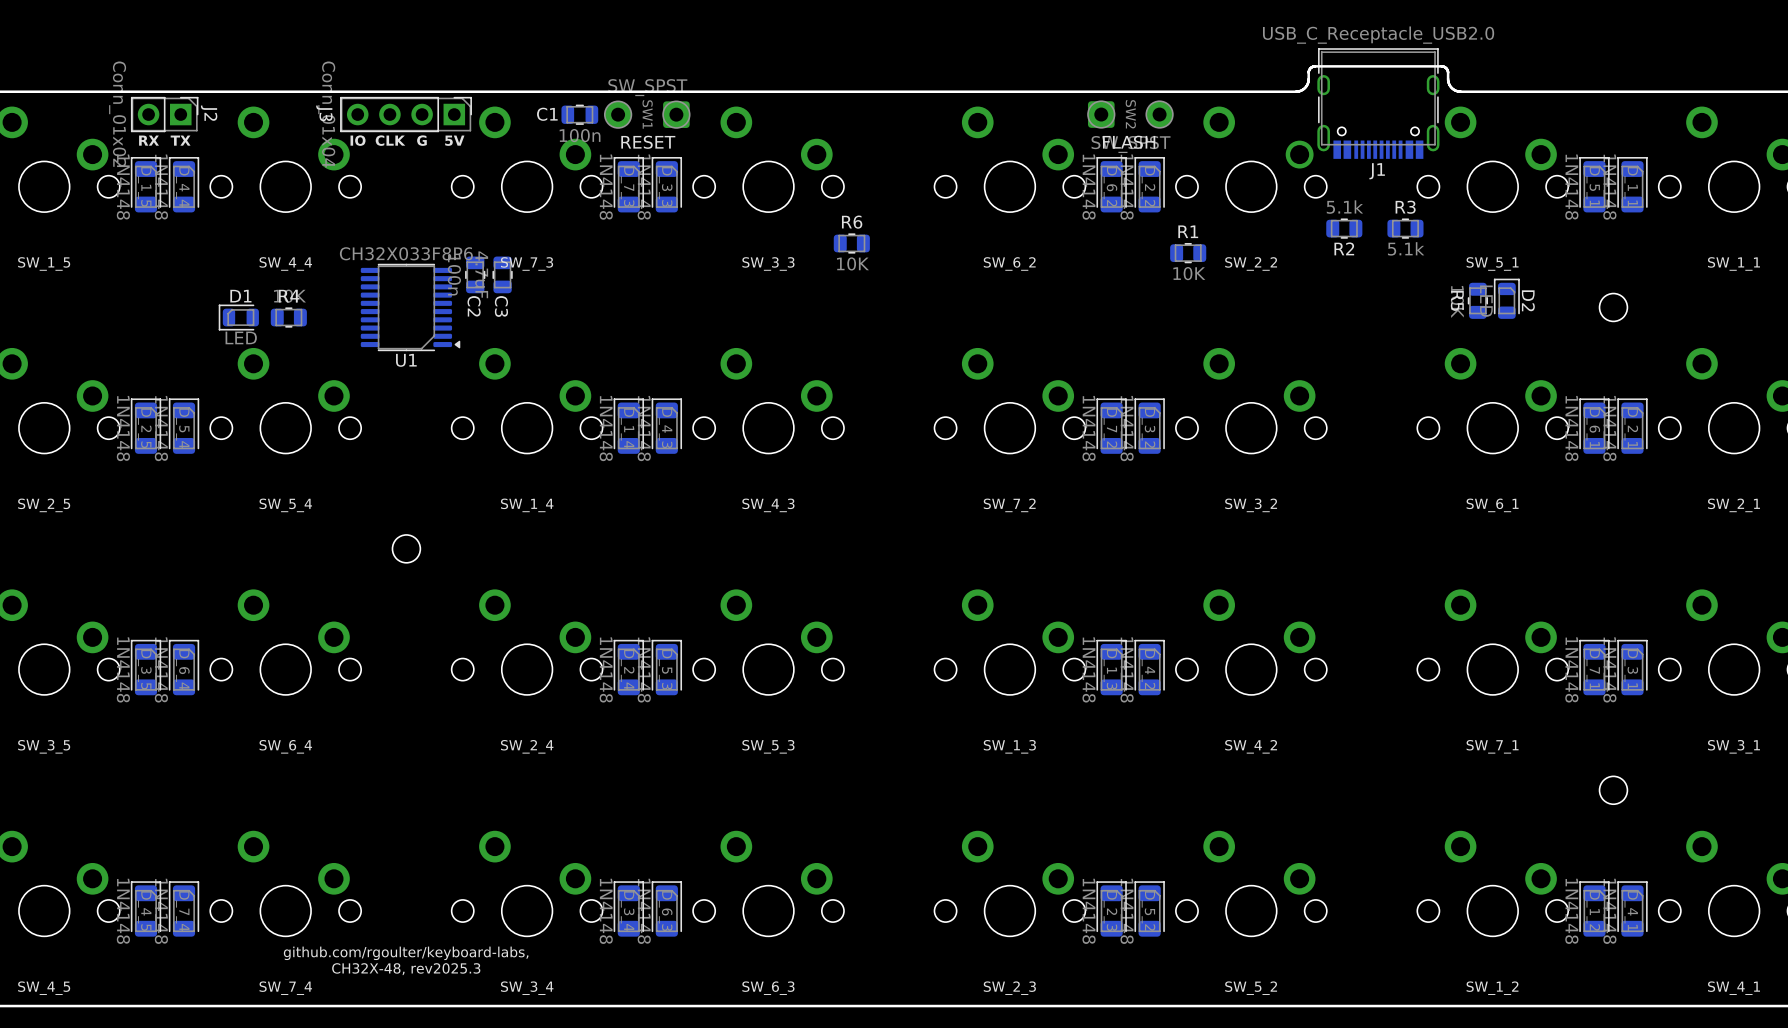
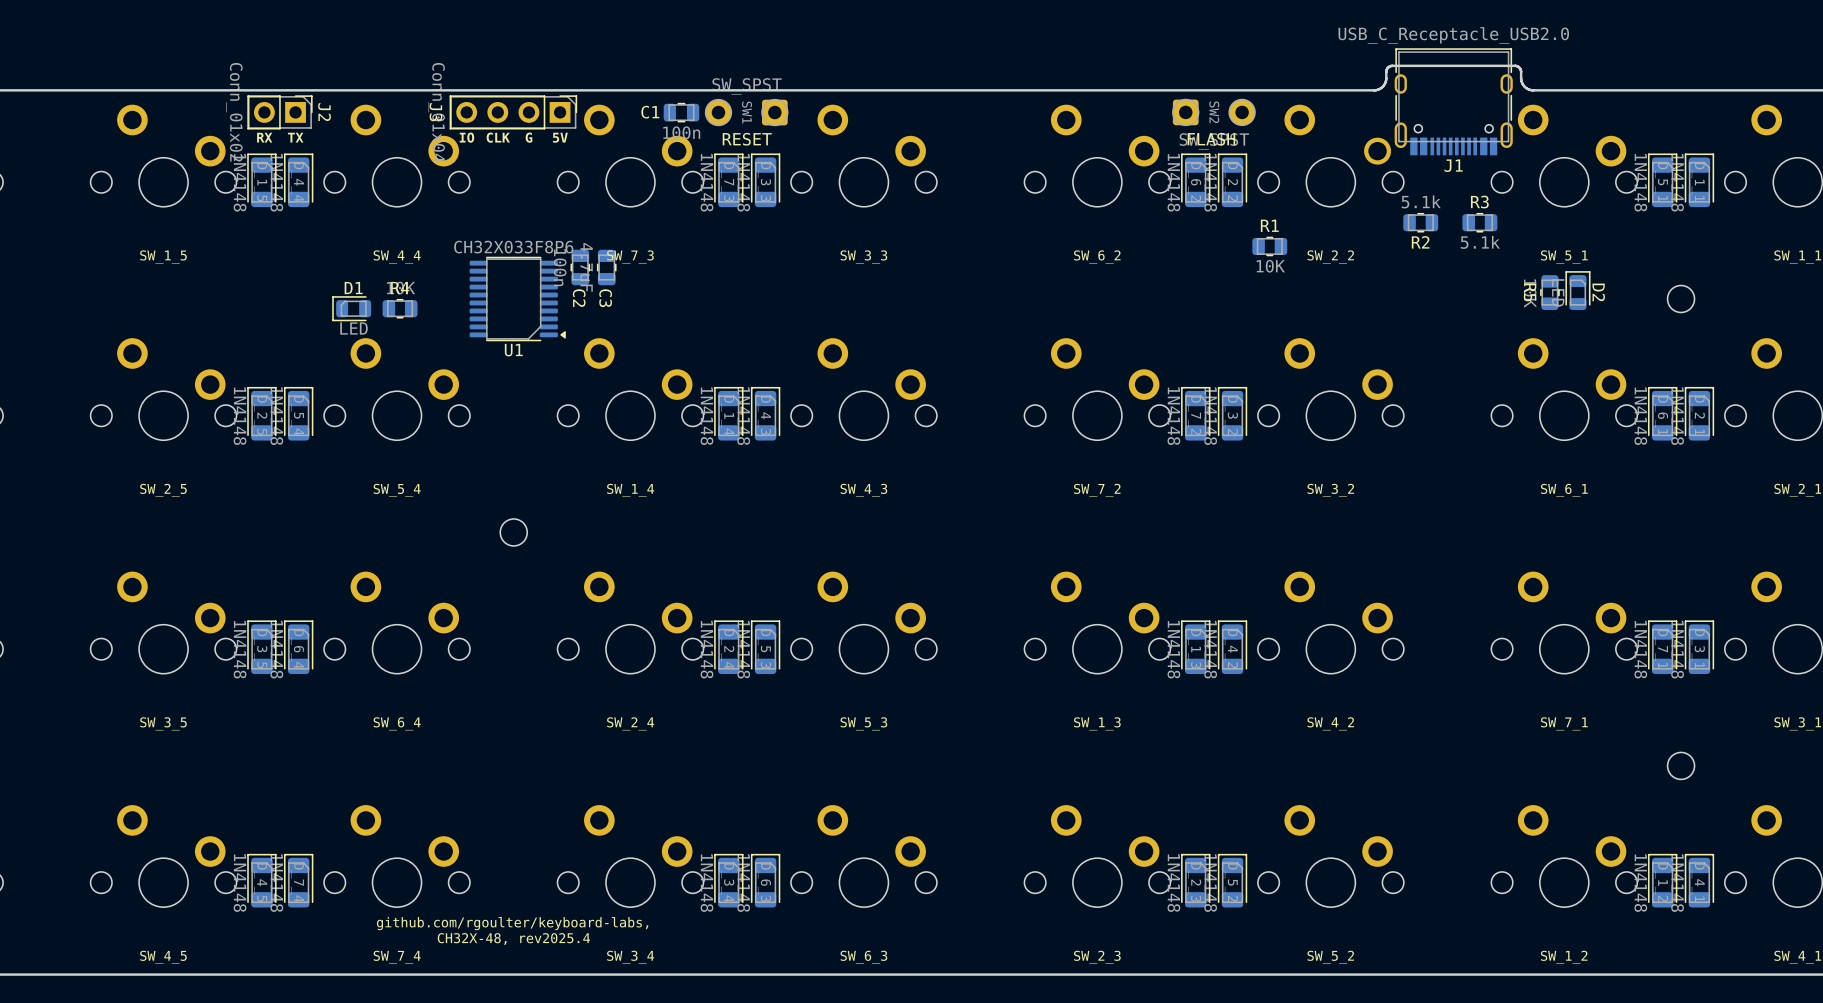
R6: 10K (851, 243) -> none
text: CH32X-48, rev2025.3 (406, 969) -> CH32X-48, rev2025.4 (513, 939)

